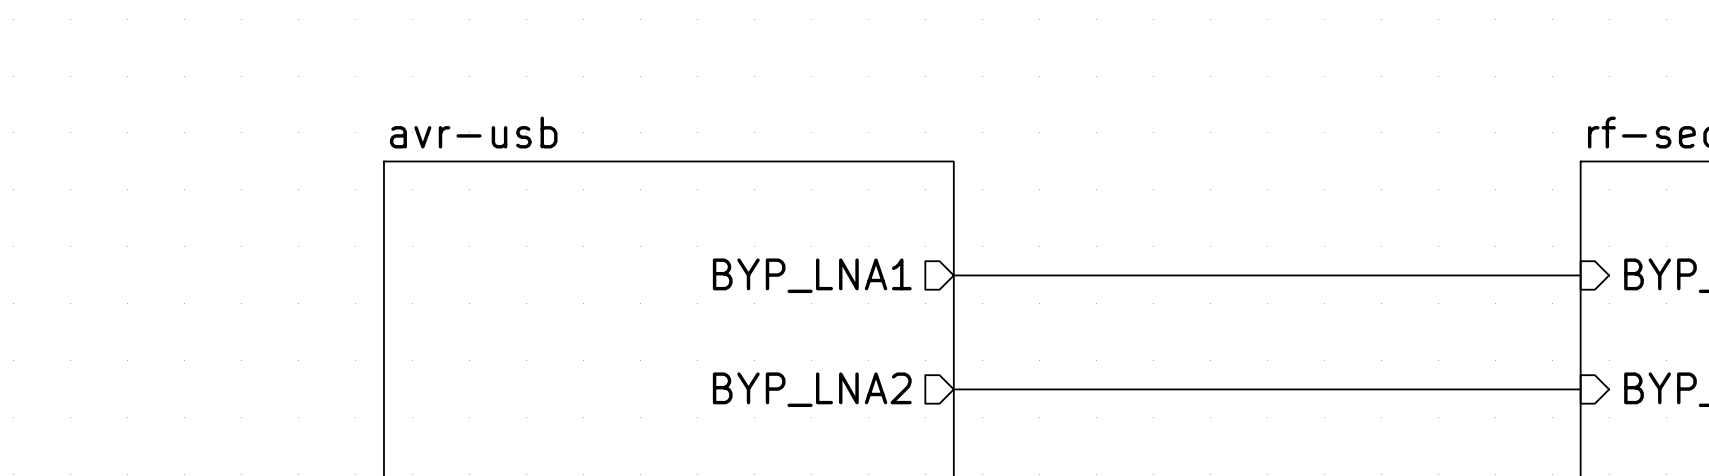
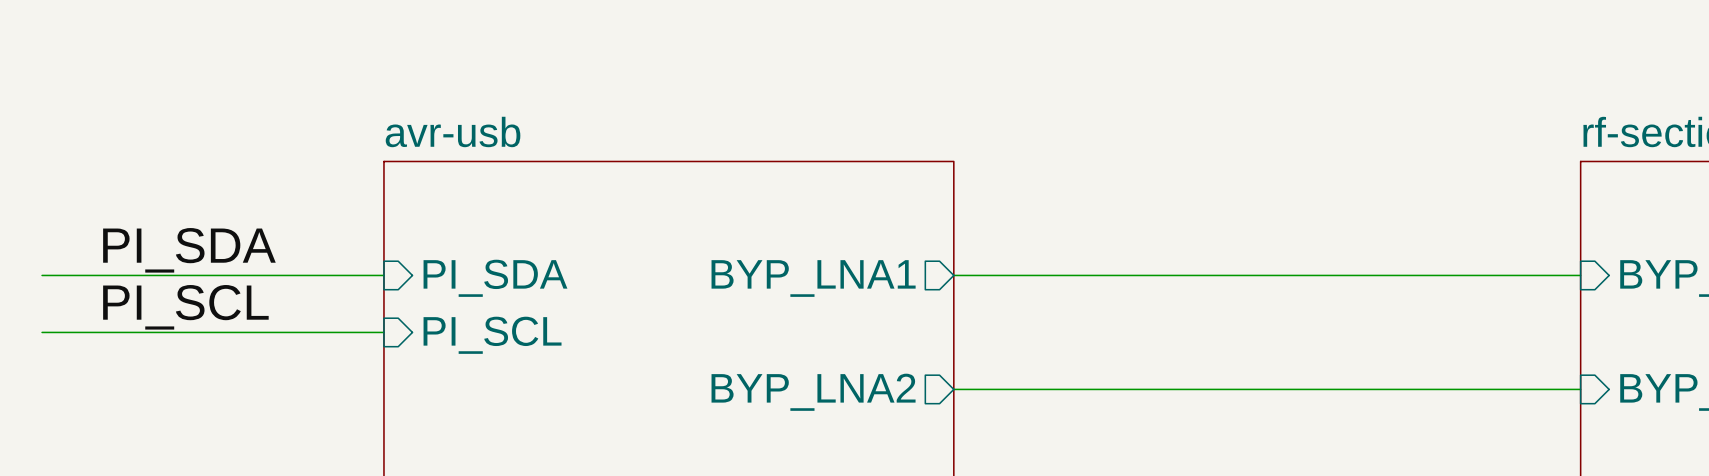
label: none -> PI_SDA (189, 250)
wire: none -> (42, 275) (383, 275)
sheet pin: none -> PI_SDA (495, 278)
label: none -> PI_SCL (185, 307)
wire: none -> (42, 332) (383, 332)
sheet pin: none -> PI_SCL (492, 335)

